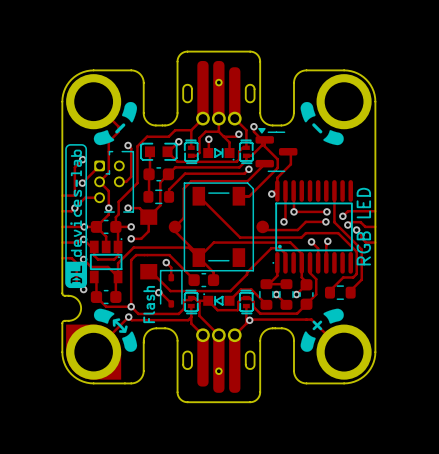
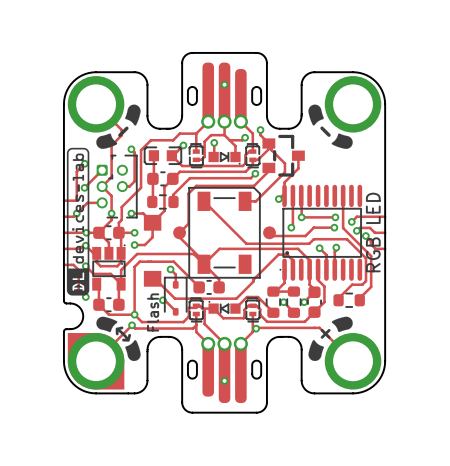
part footprint: [255, 127, 298, 173] -> [262, 134, 305, 177]

